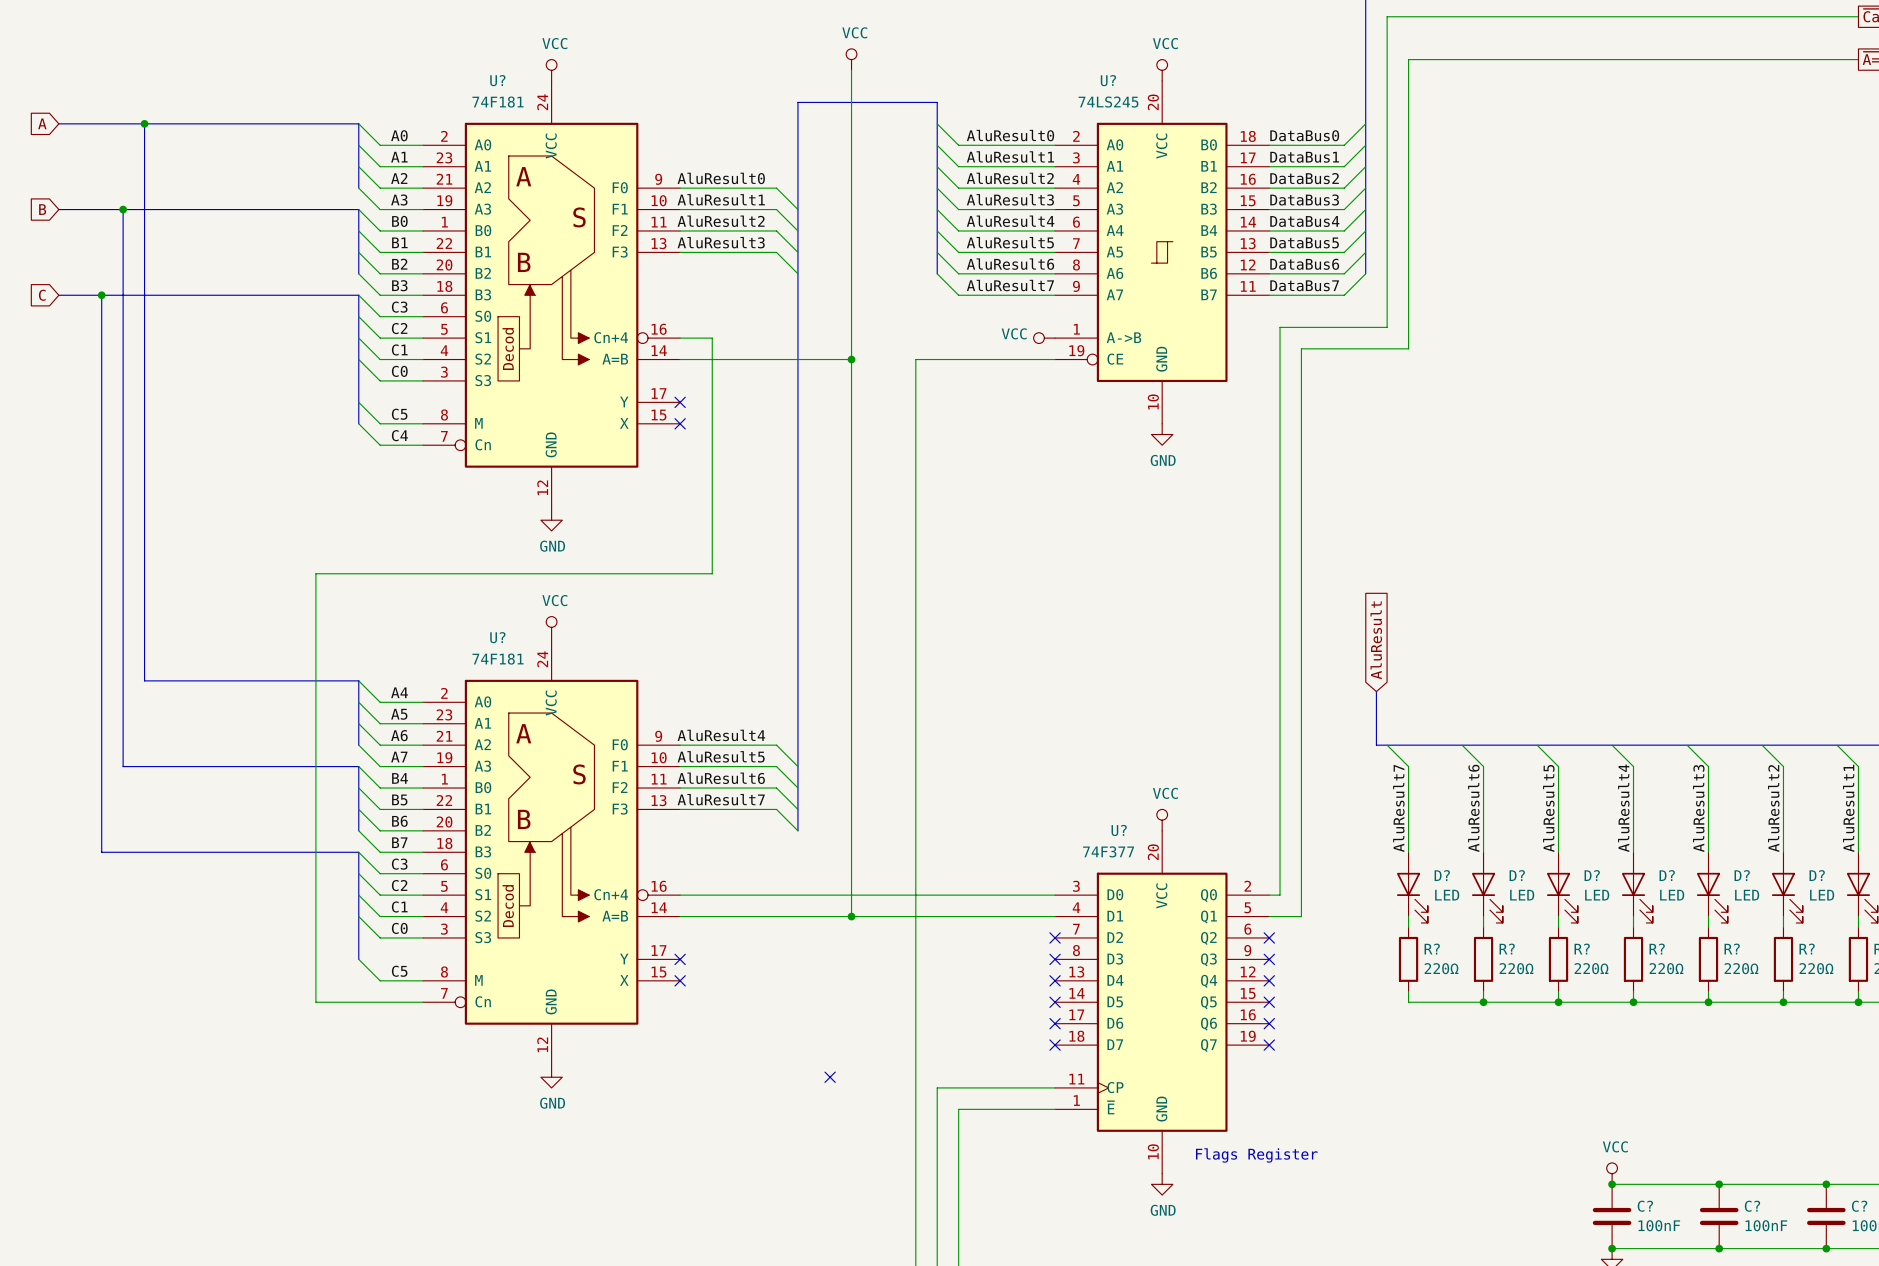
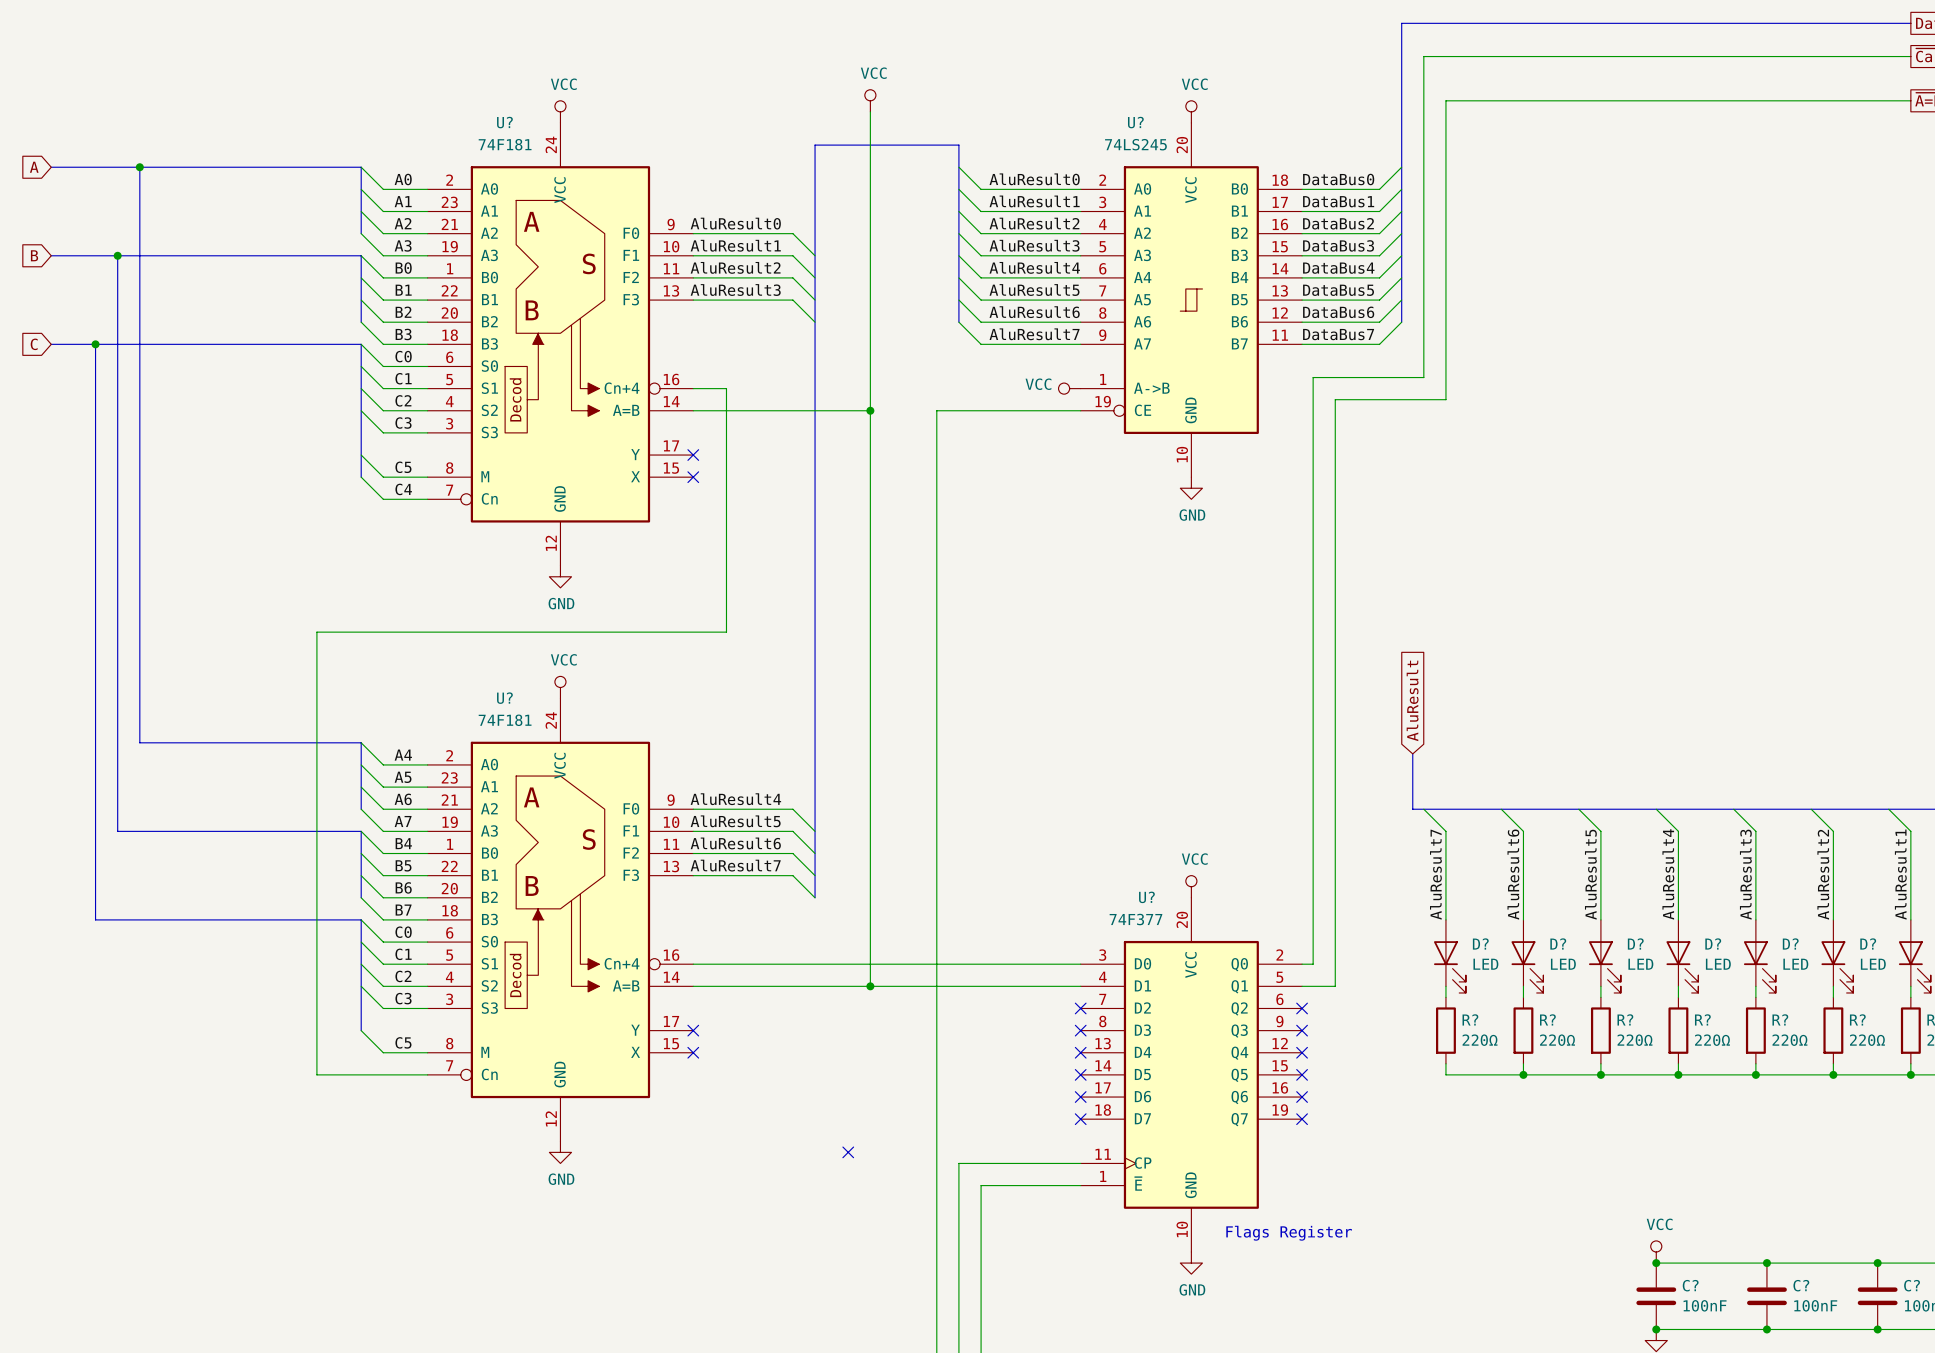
label: C3 (399, 307) -> C0 (403, 356)
label: C2 (399, 328) -> C1 (403, 378)
label: C1 (399, 349) -> C2 (403, 400)
label: C0 (399, 371) -> C3 (403, 423)
label: C3 (399, 864) -> C0 (403, 932)
label: C2 (399, 885) -> C1 (403, 954)
label: C1 (399, 907) -> C2 (403, 976)
label: C0 (399, 928) -> C3 (403, 998)

